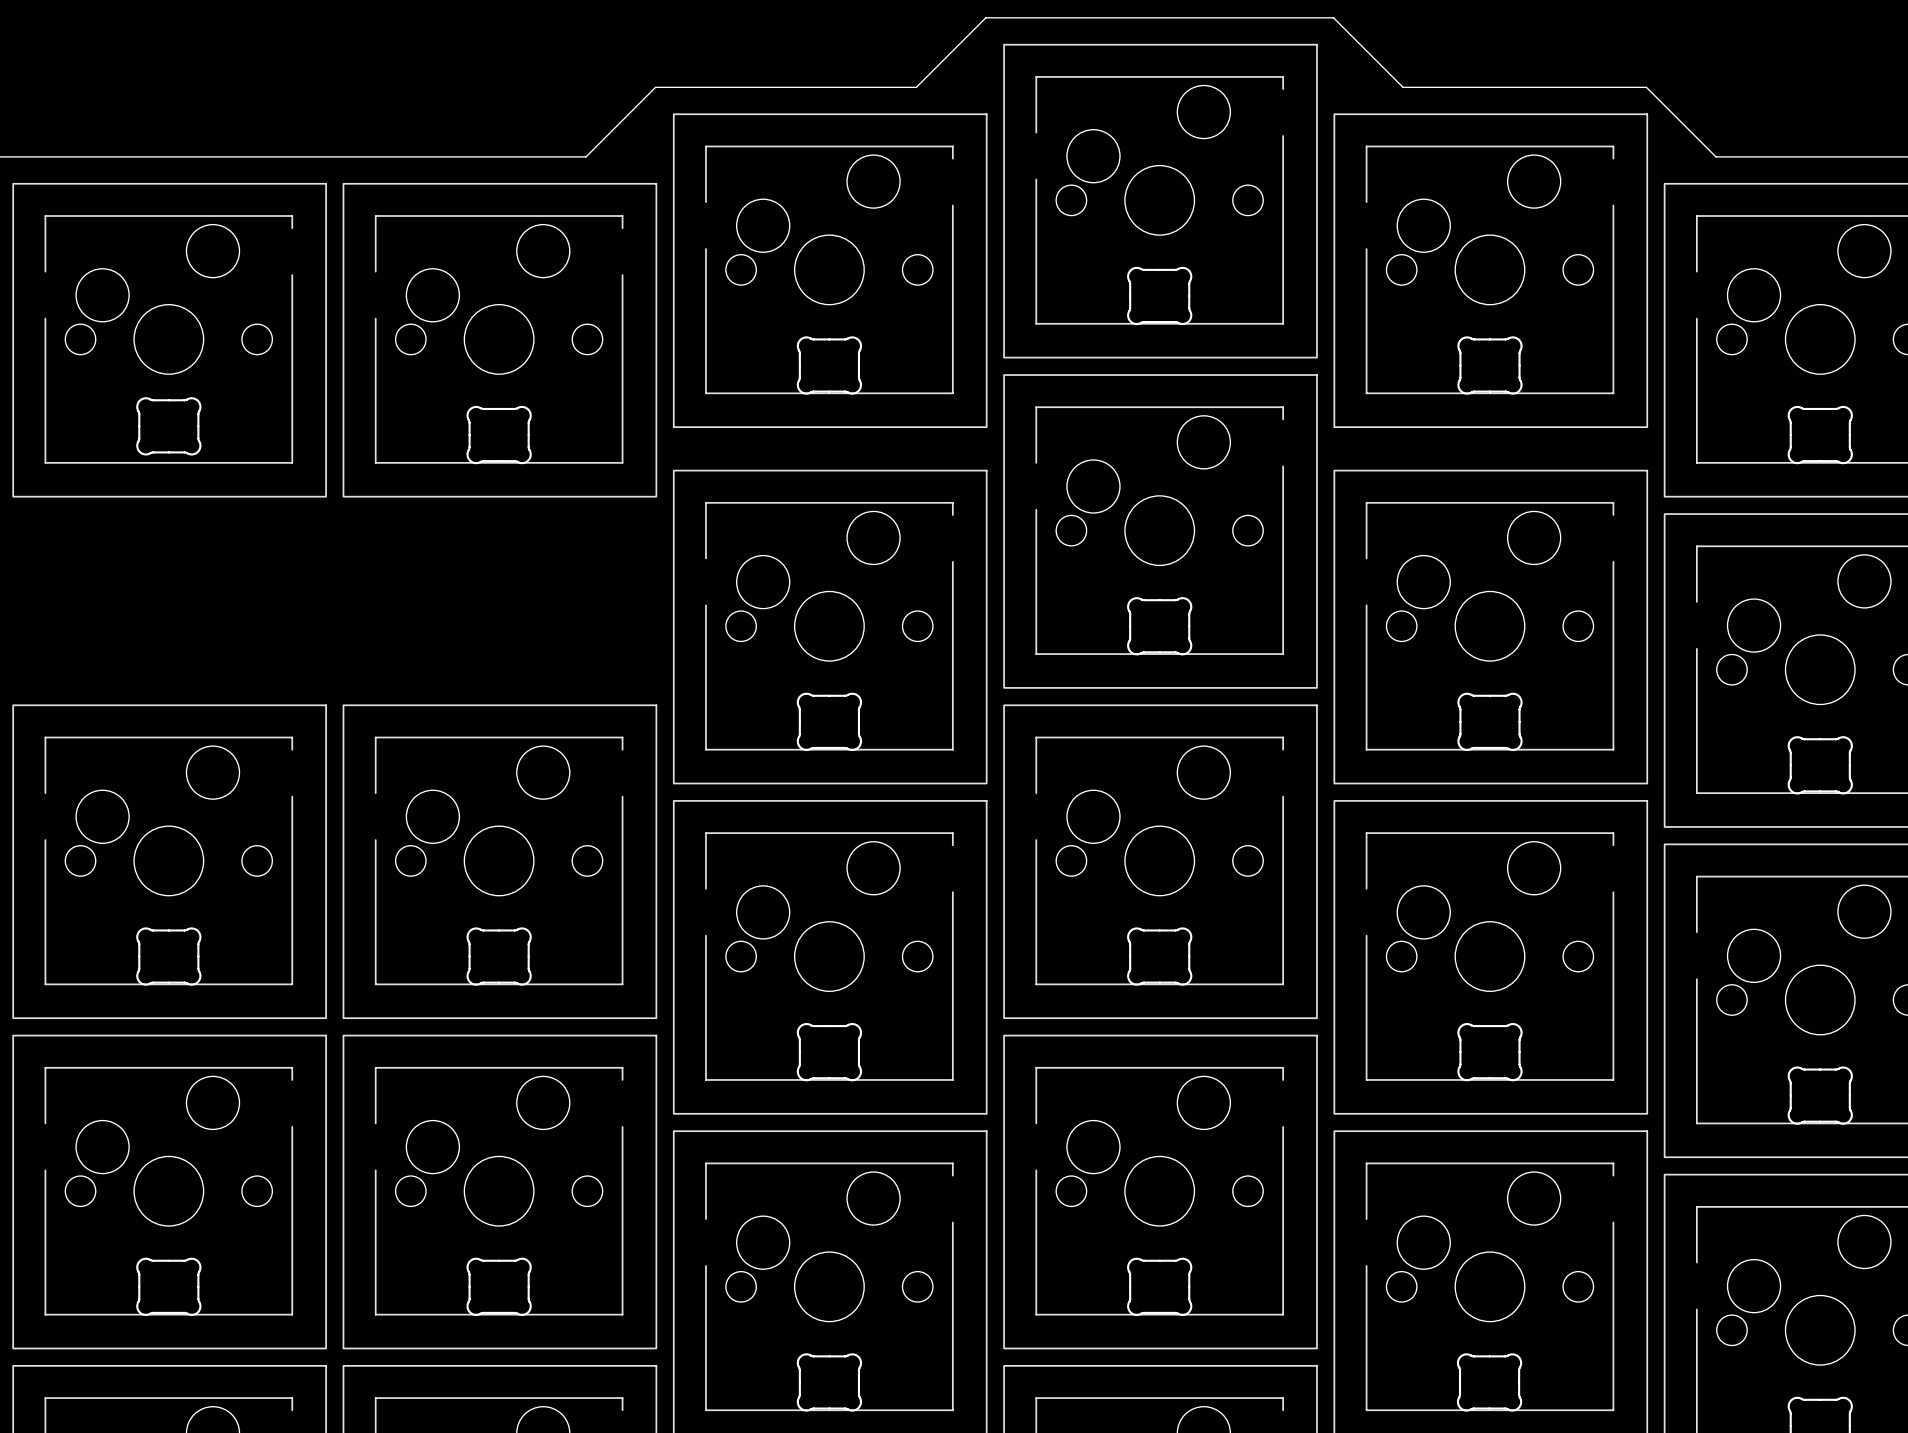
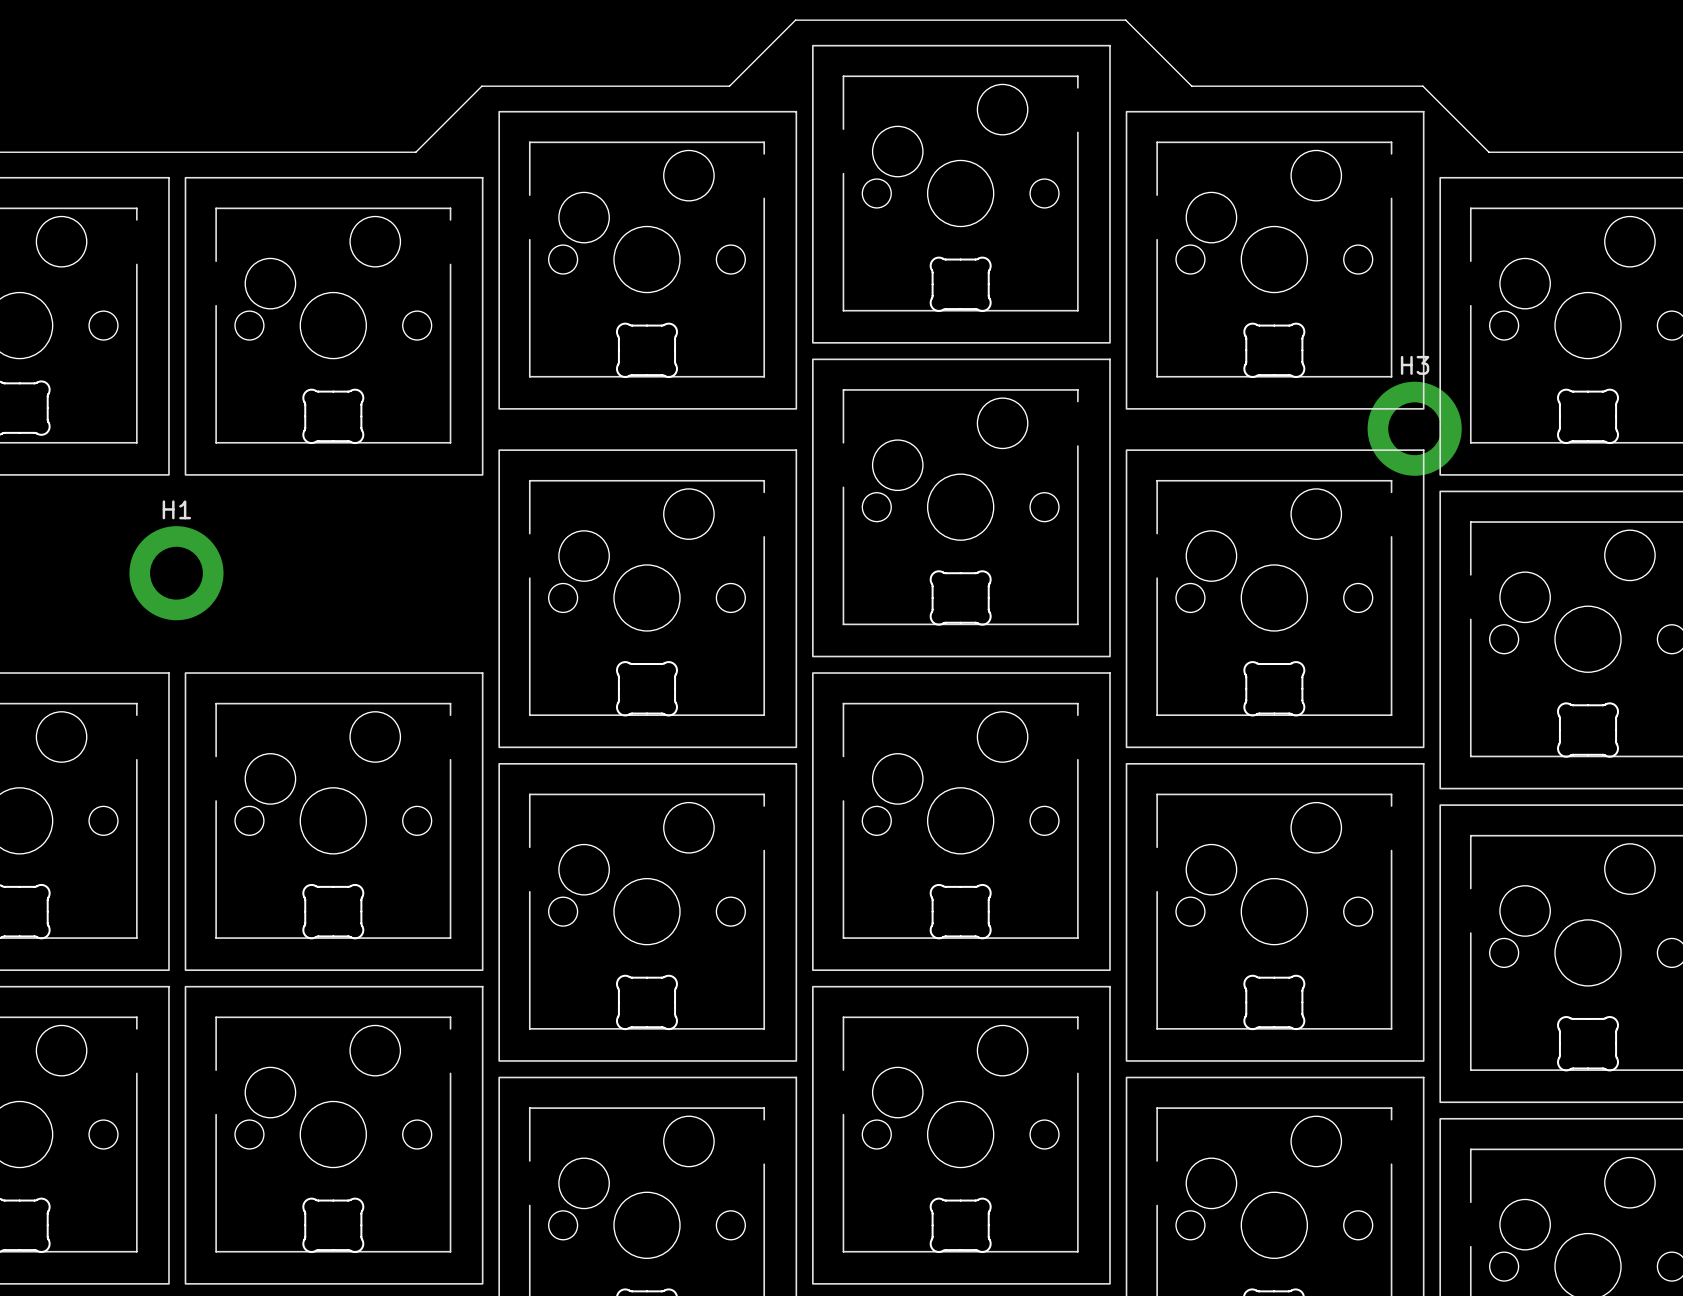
H3: none -> (1414, 428)
H1: none -> (176, 573)

